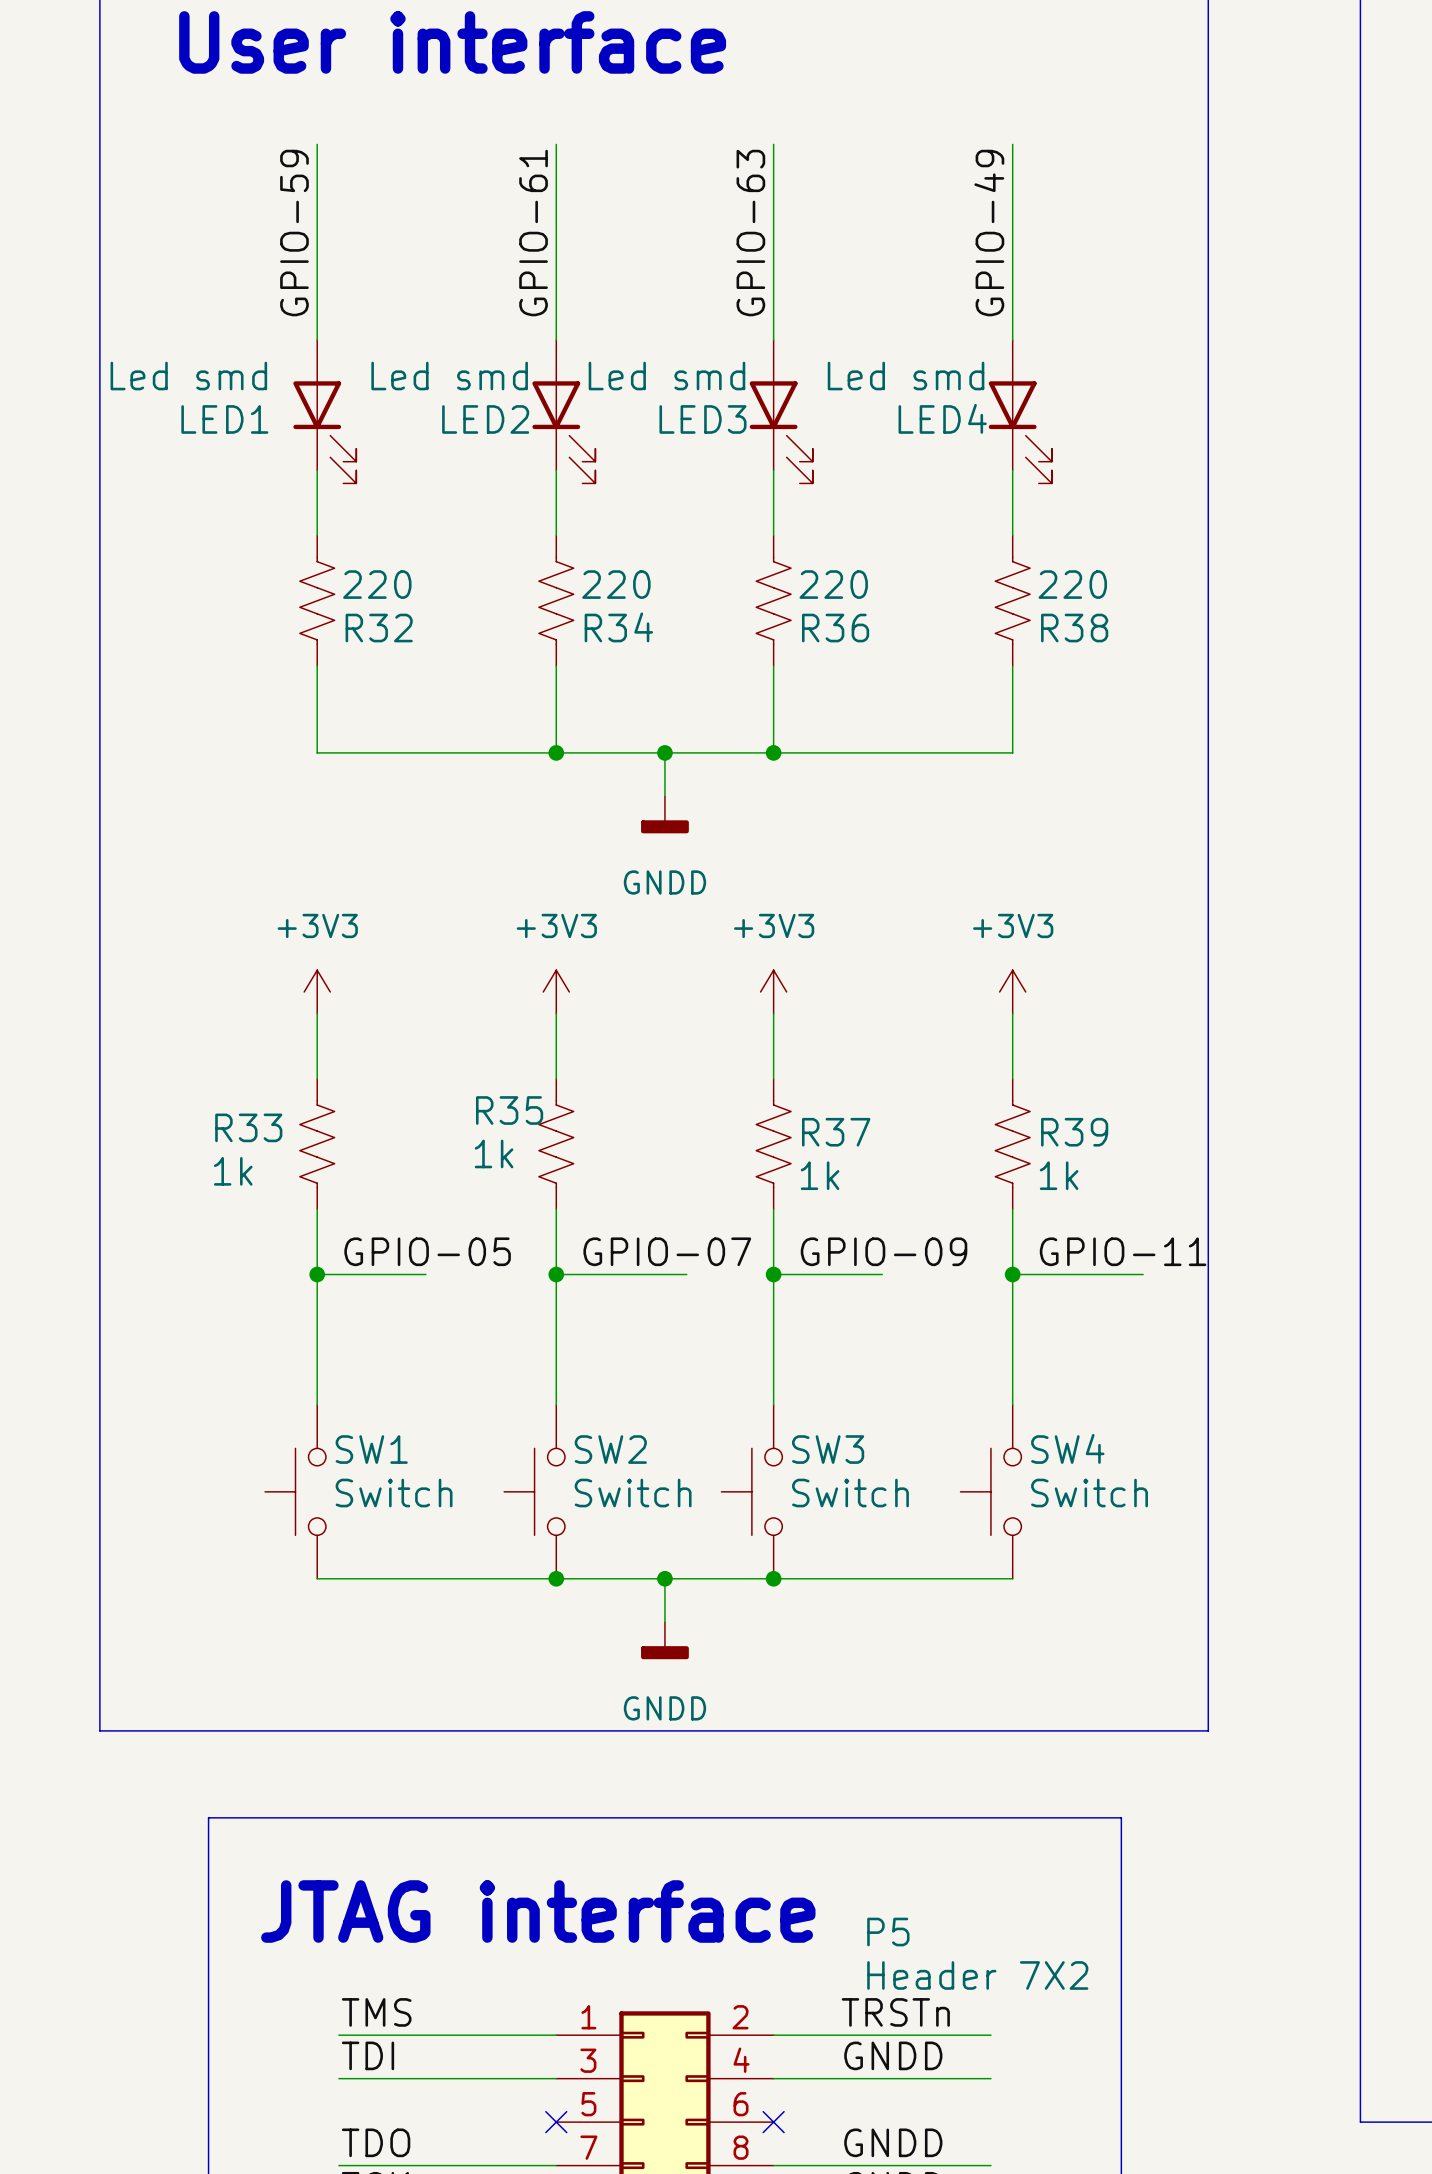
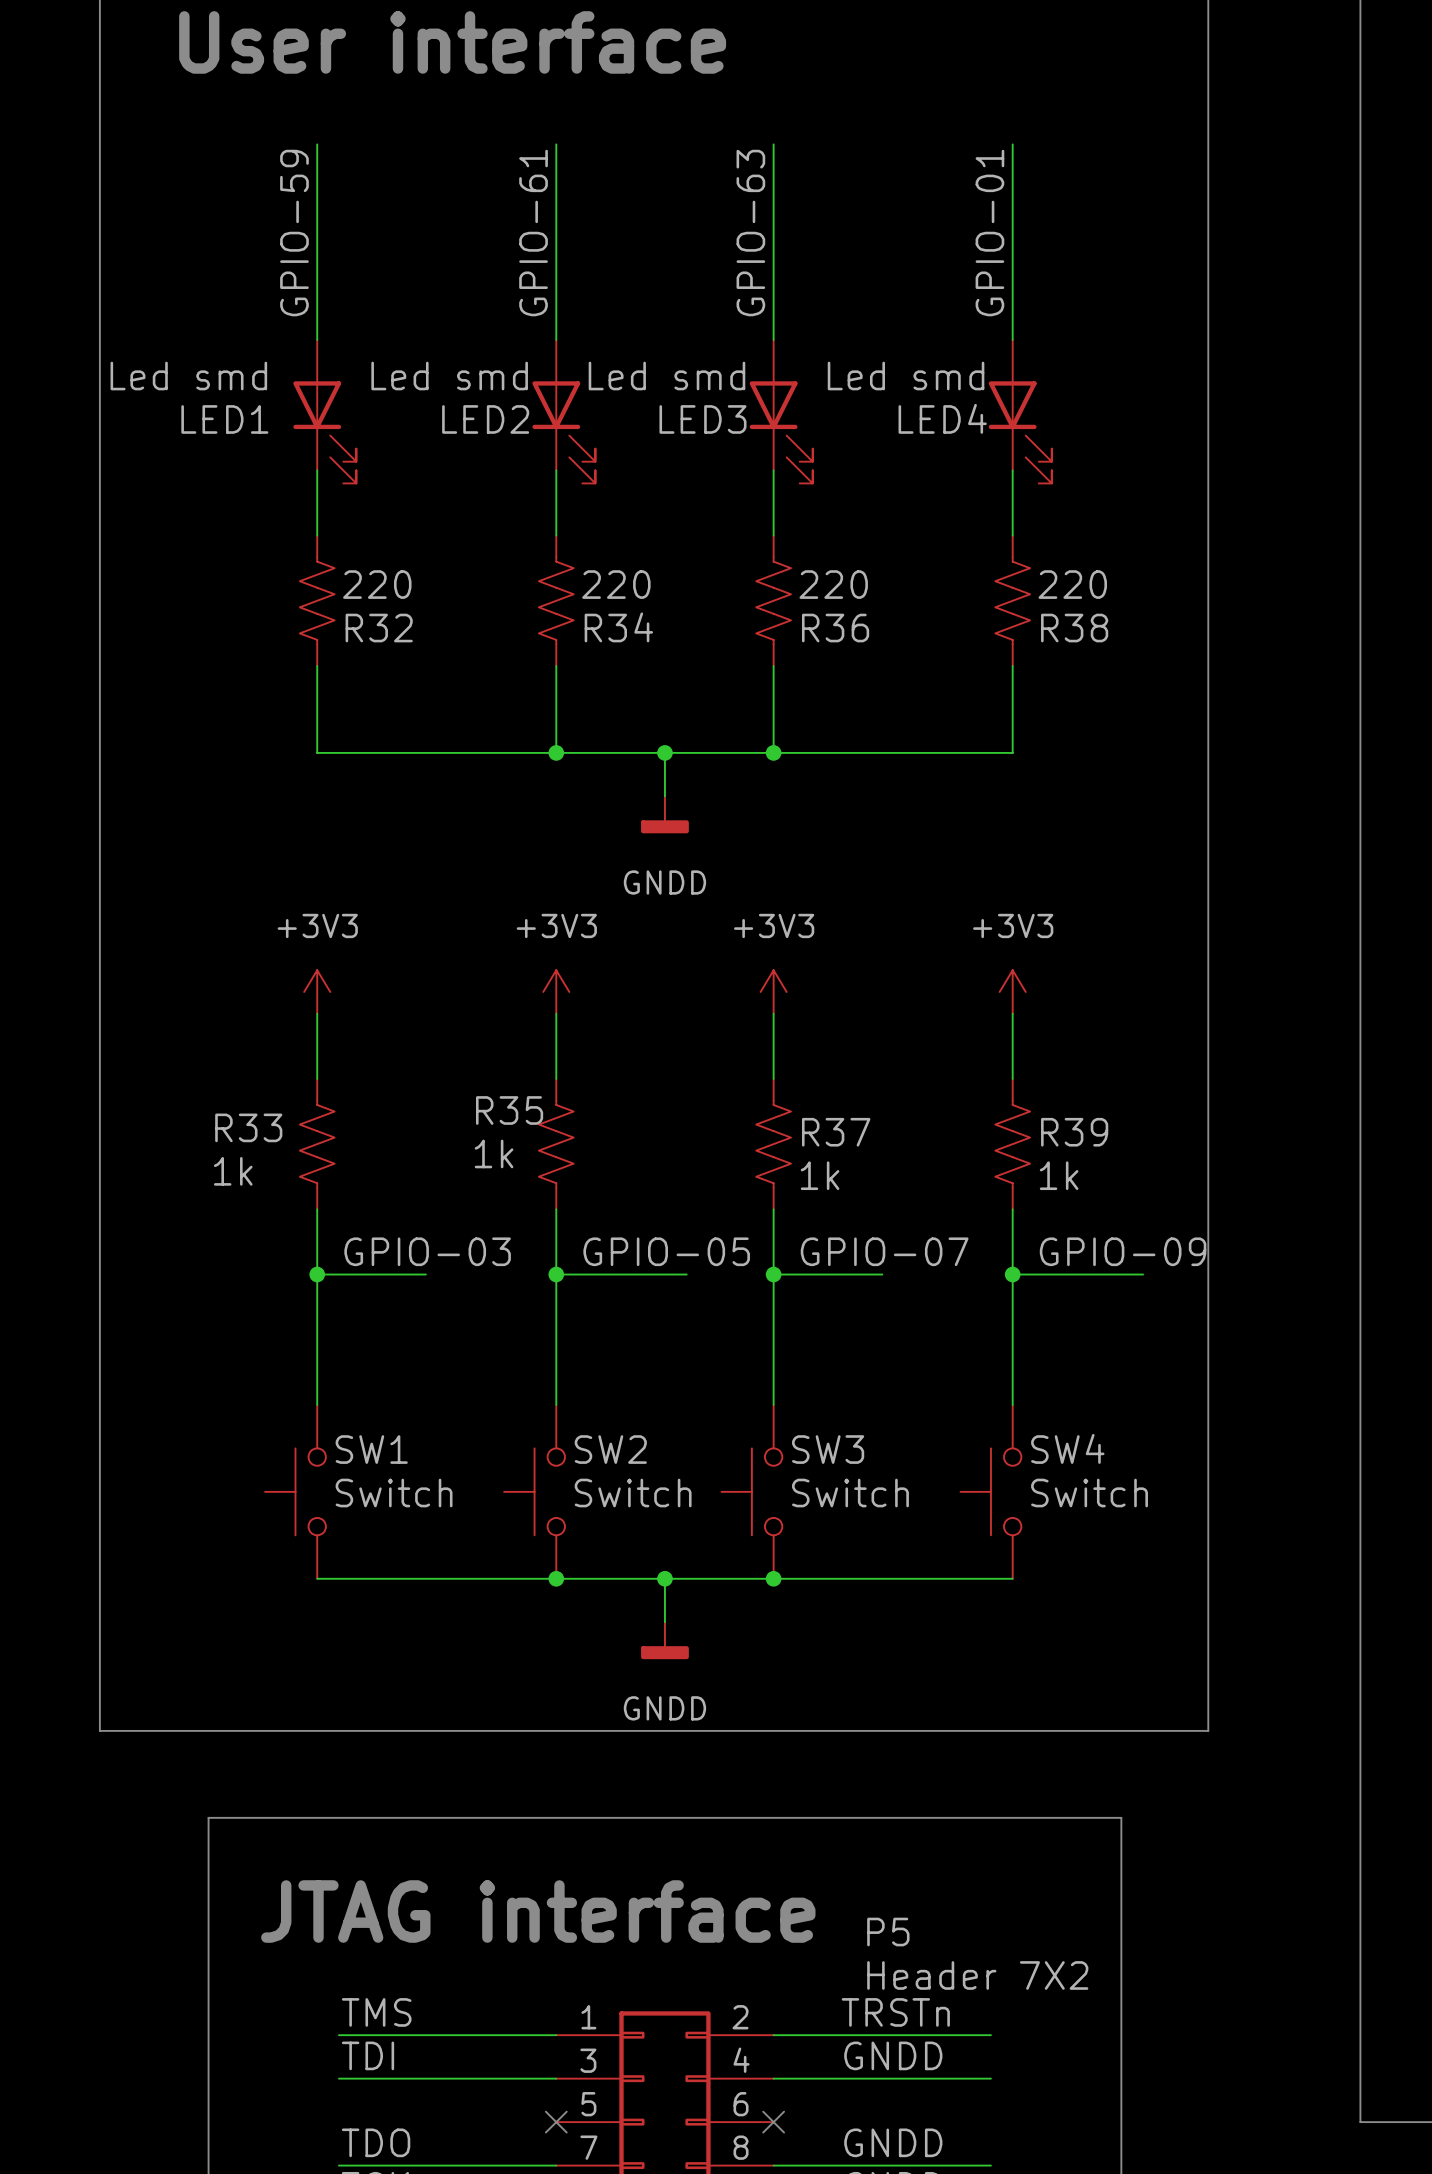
label: GPIO-49 (989, 233) -> GPIO-01 (989, 233)
label: GPIO-05 (427, 1251) -> GPIO-03 (427, 1251)
label: GPIO-07 (667, 1251) -> GPIO-05 (666, 1251)
label: GPIO-09 (884, 1251) -> GPIO-07 (884, 1251)
label: GPIO-11 (1123, 1251) -> GPIO-09 (1123, 1251)

